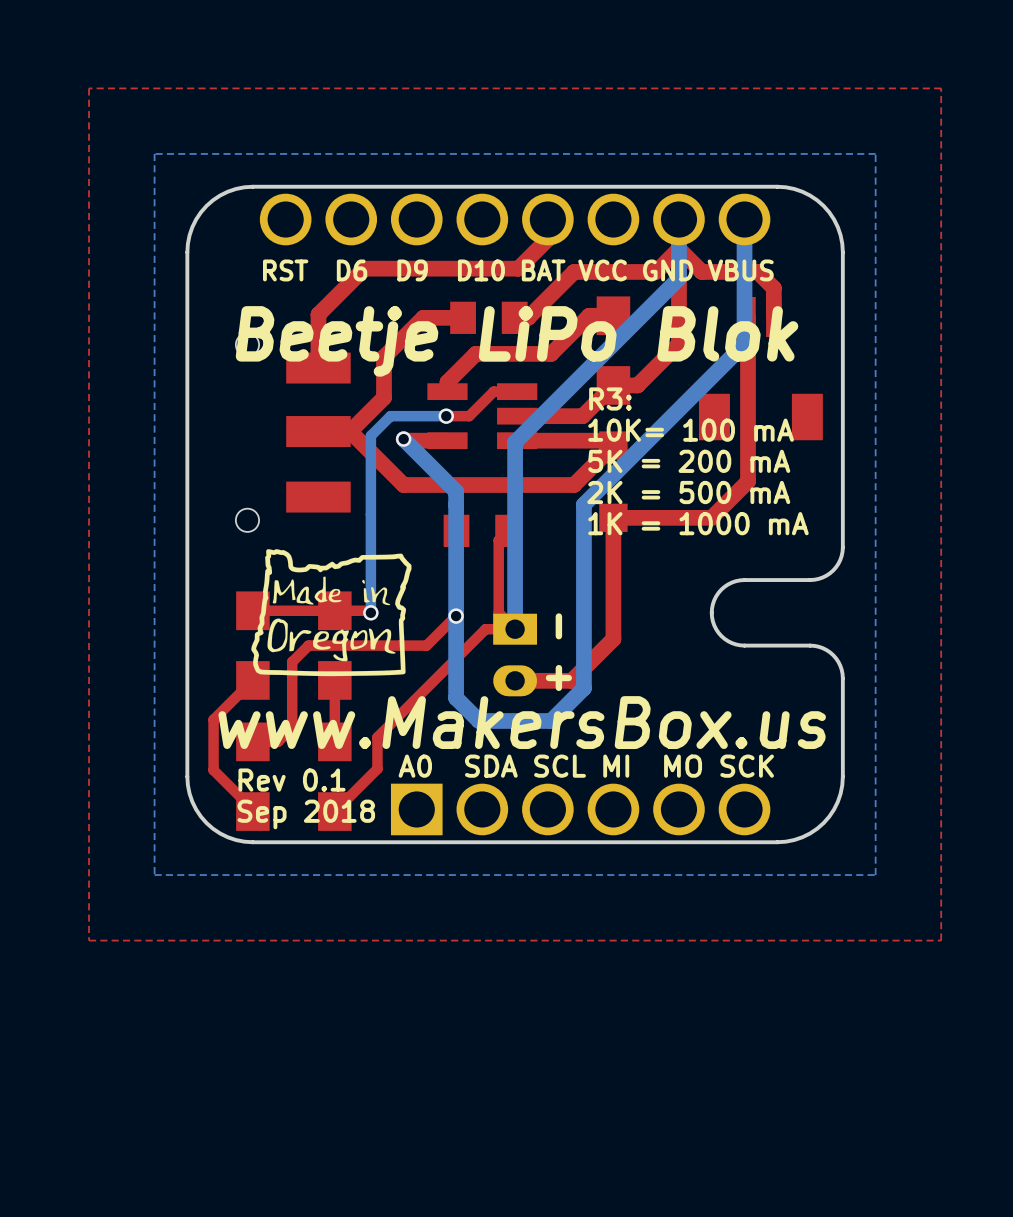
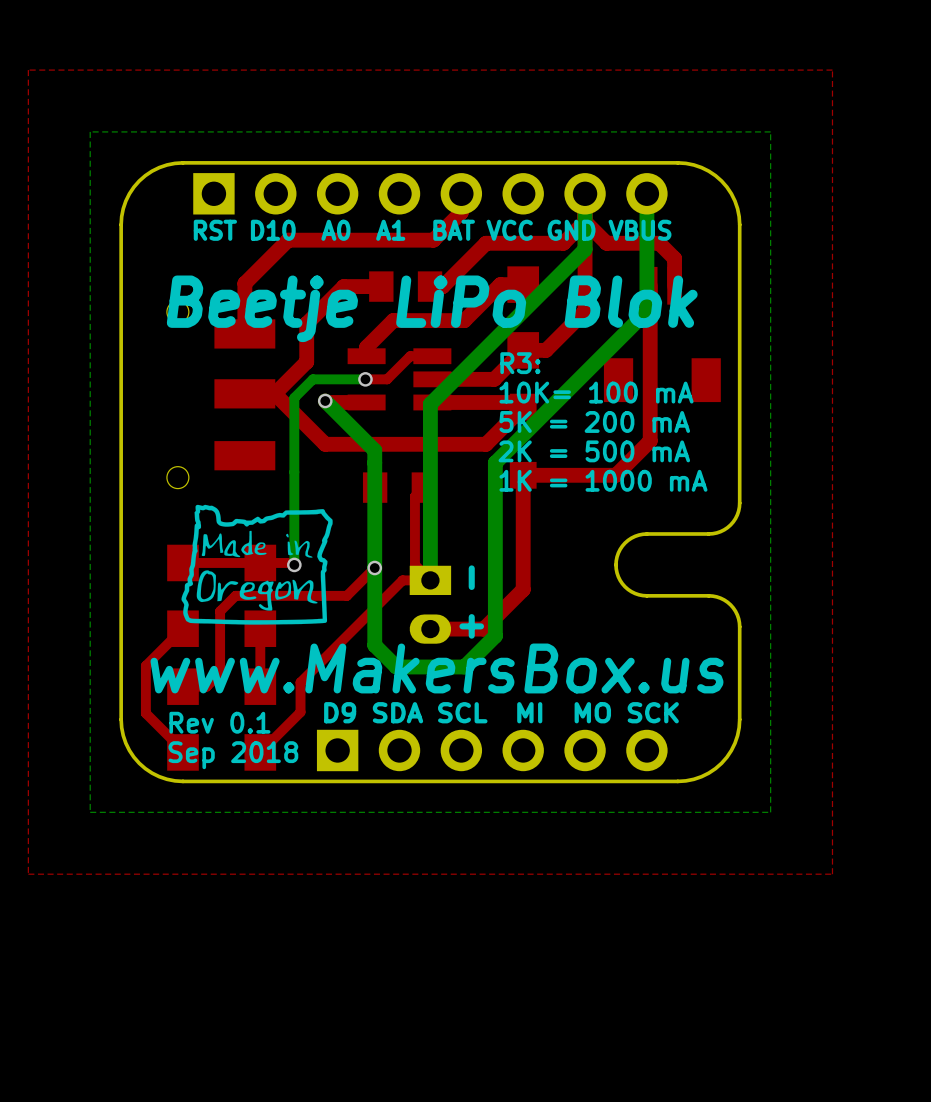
part footprint: [259, 193, 771, 246] -> [193, 173, 668, 215]
text: none -> RST D10 A0 A1 BAT VCC GND VBUS (432, 230)
text: none -> D9 SDA SCL MI MO SCK (501, 712)
part footprint: [390, 783, 771, 836] -> [316, 729, 668, 772]

